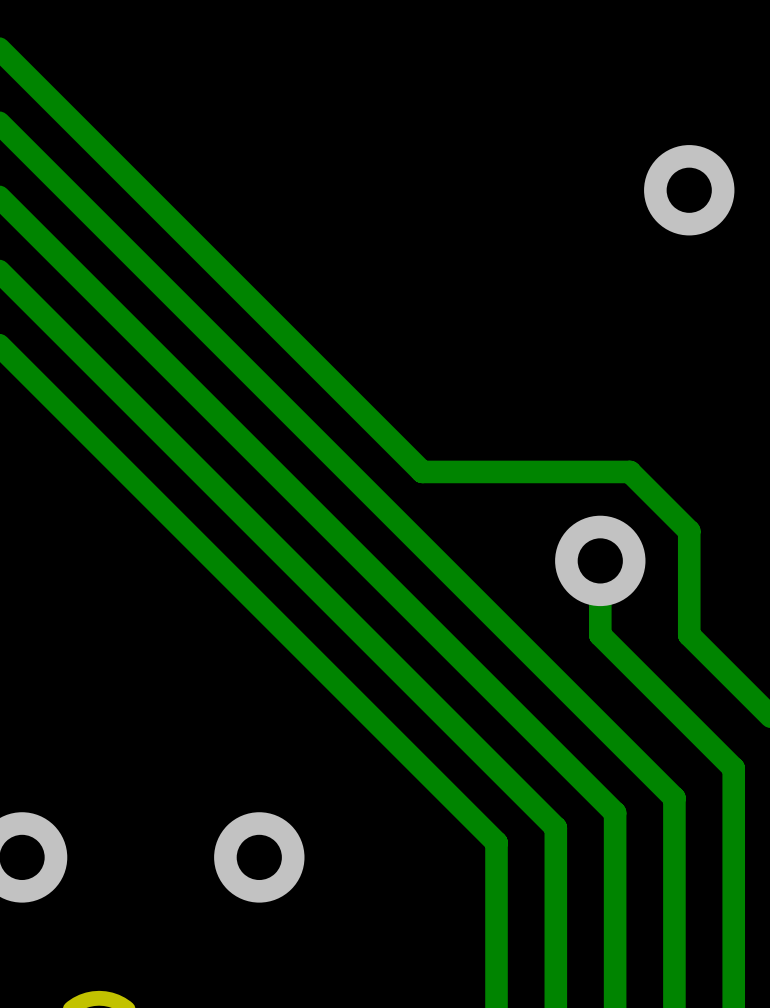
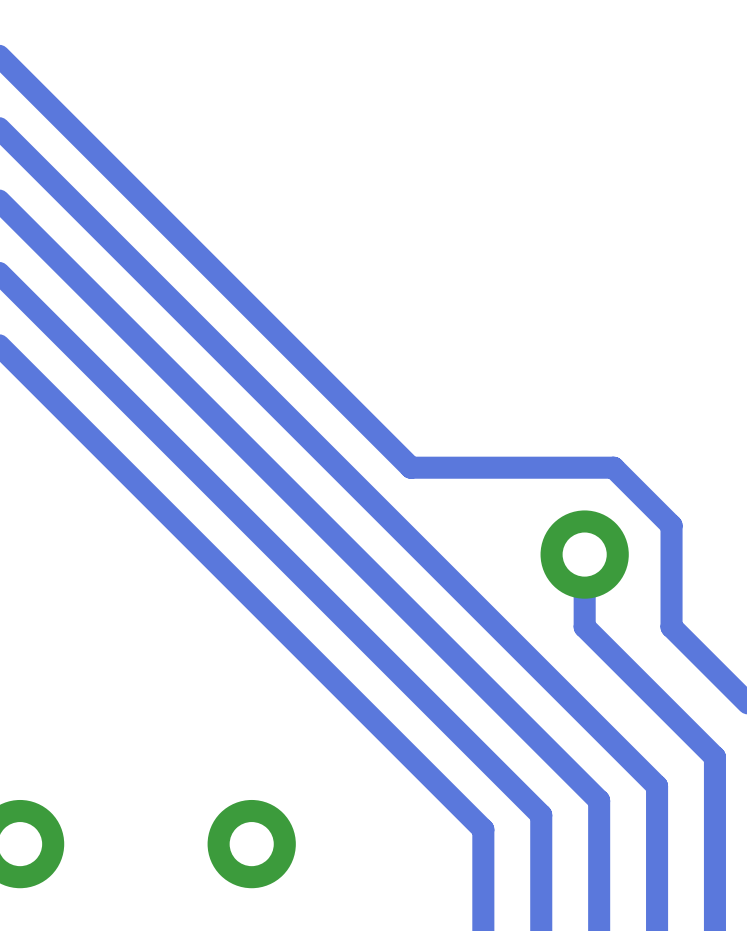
via: (689, 190) -> none

